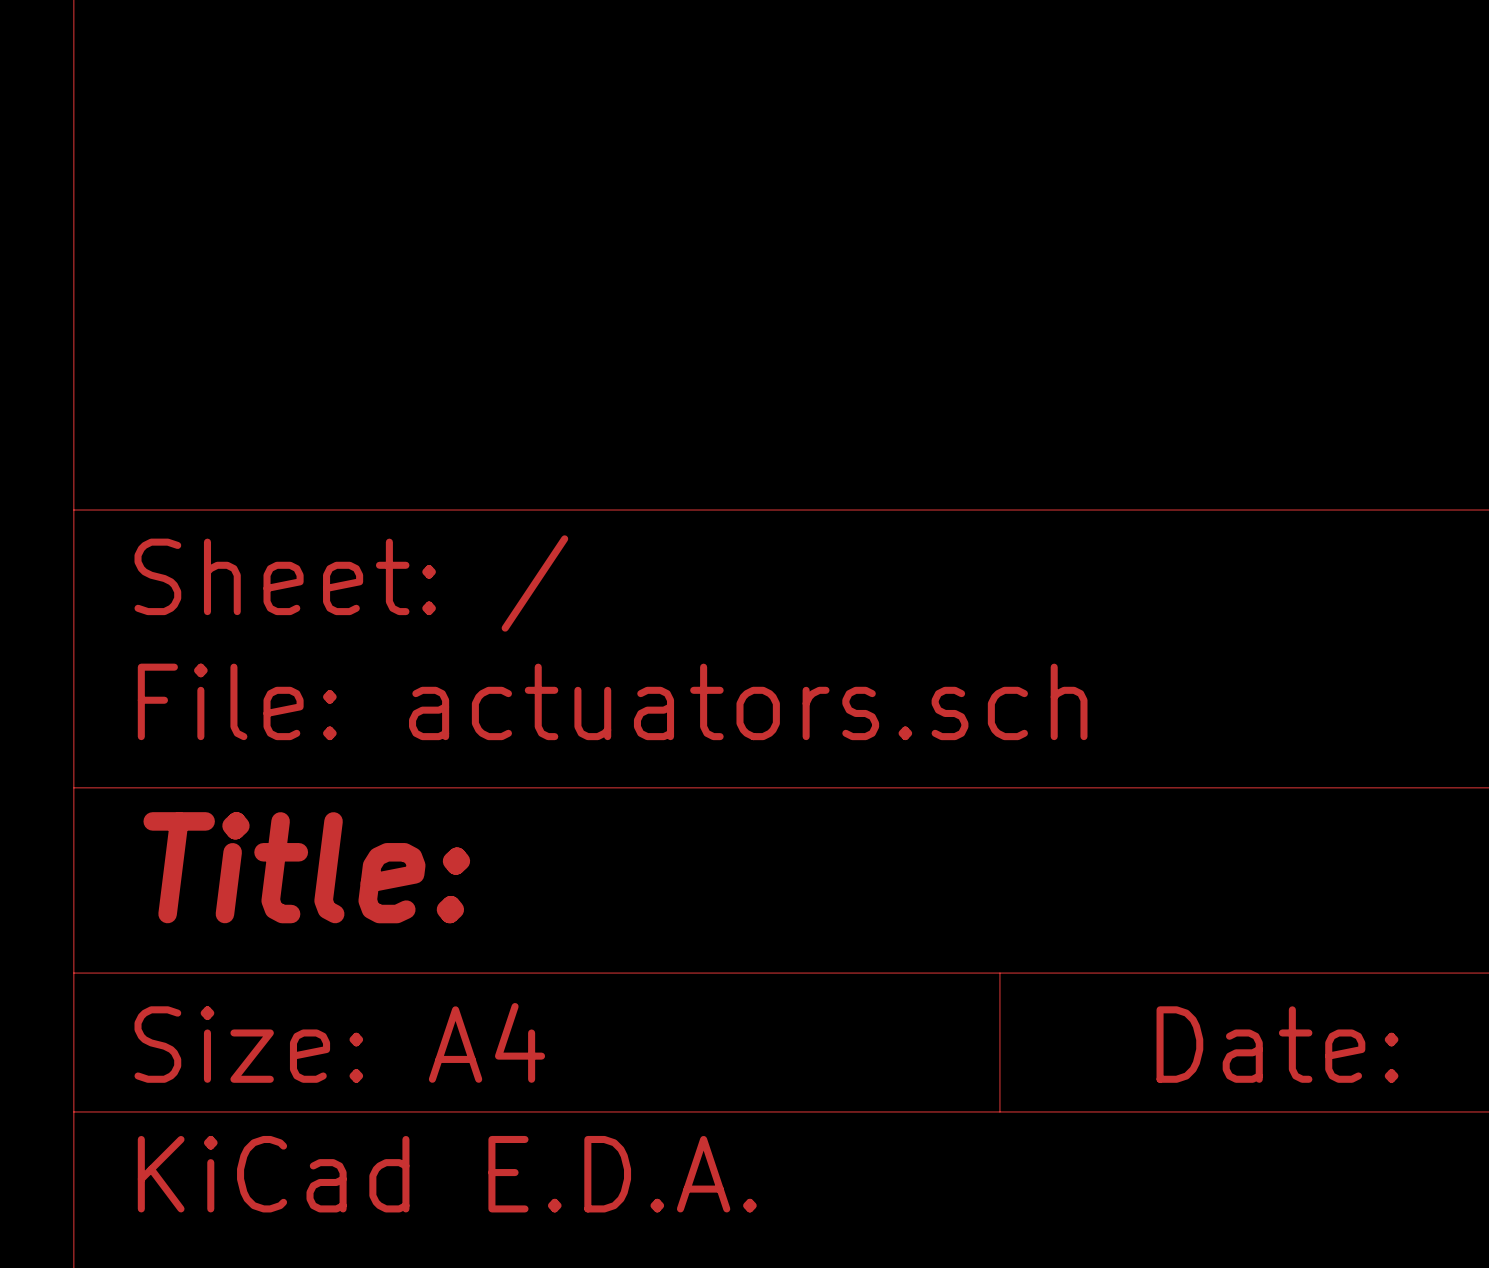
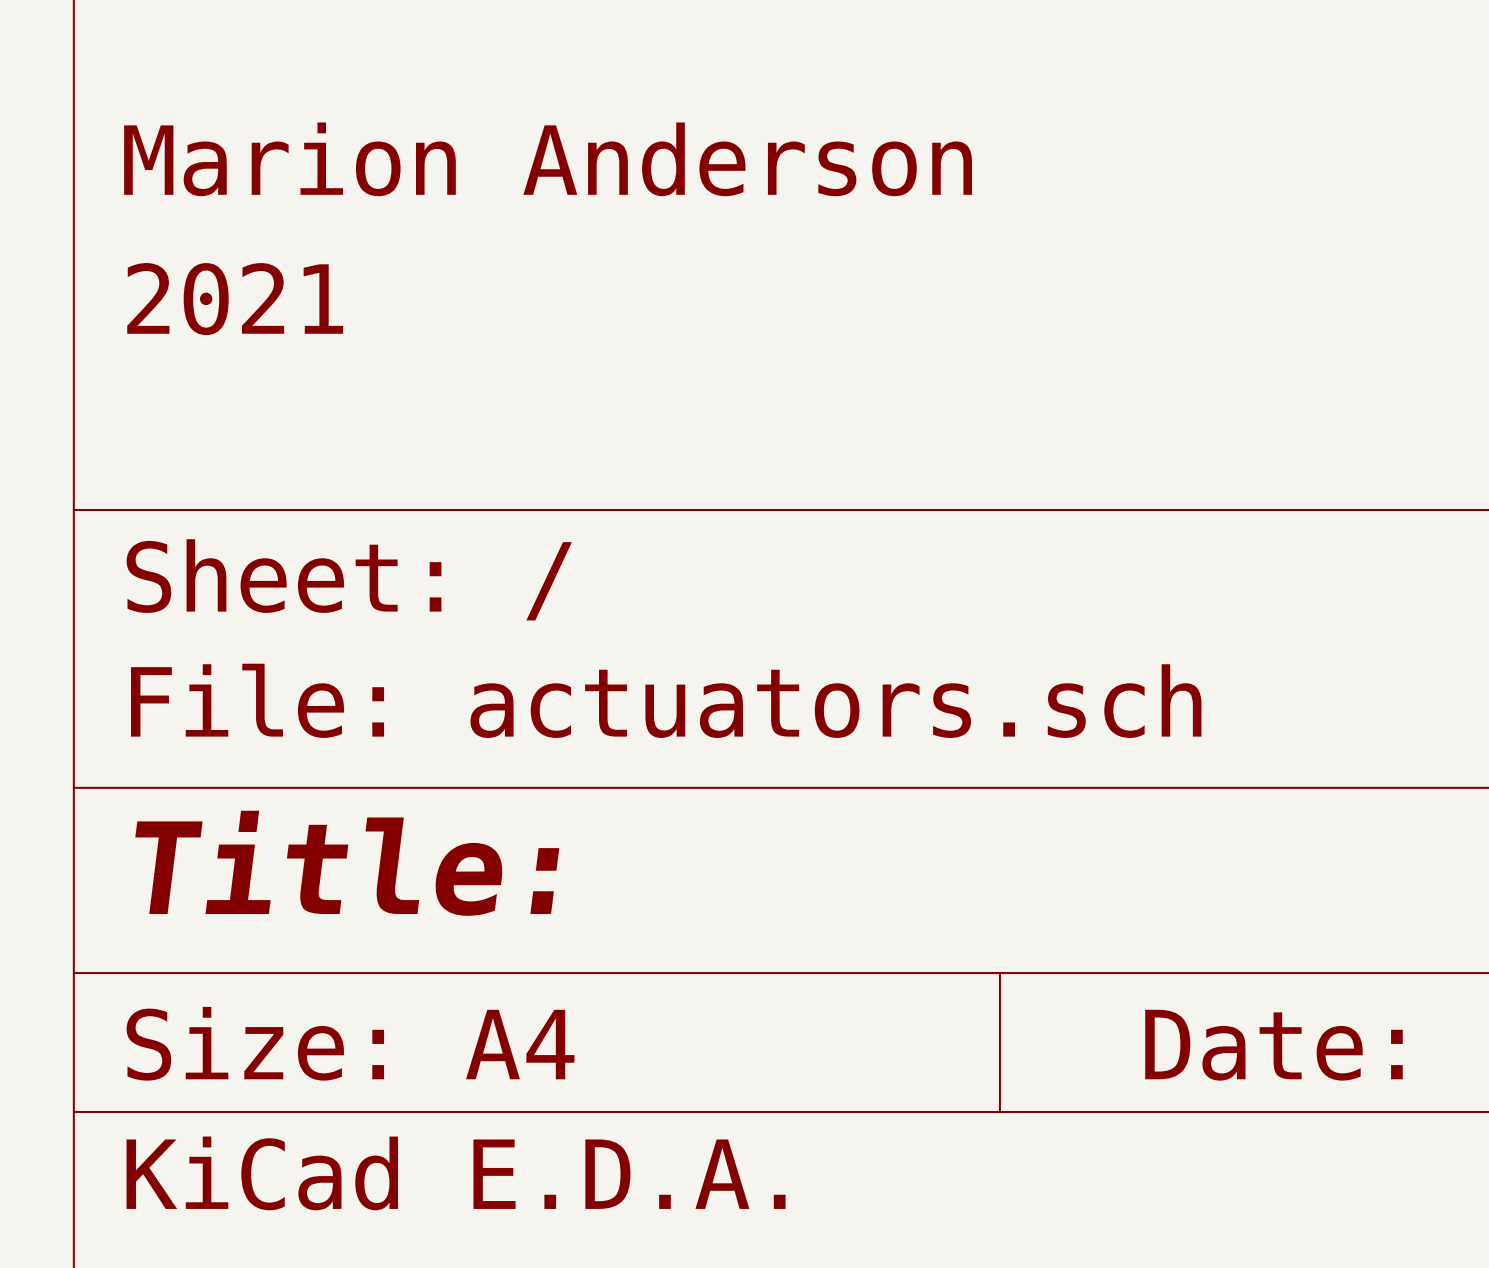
title block: none -> Marion Anderson (548, 159)
title block: none -> 2021 (235, 299)

